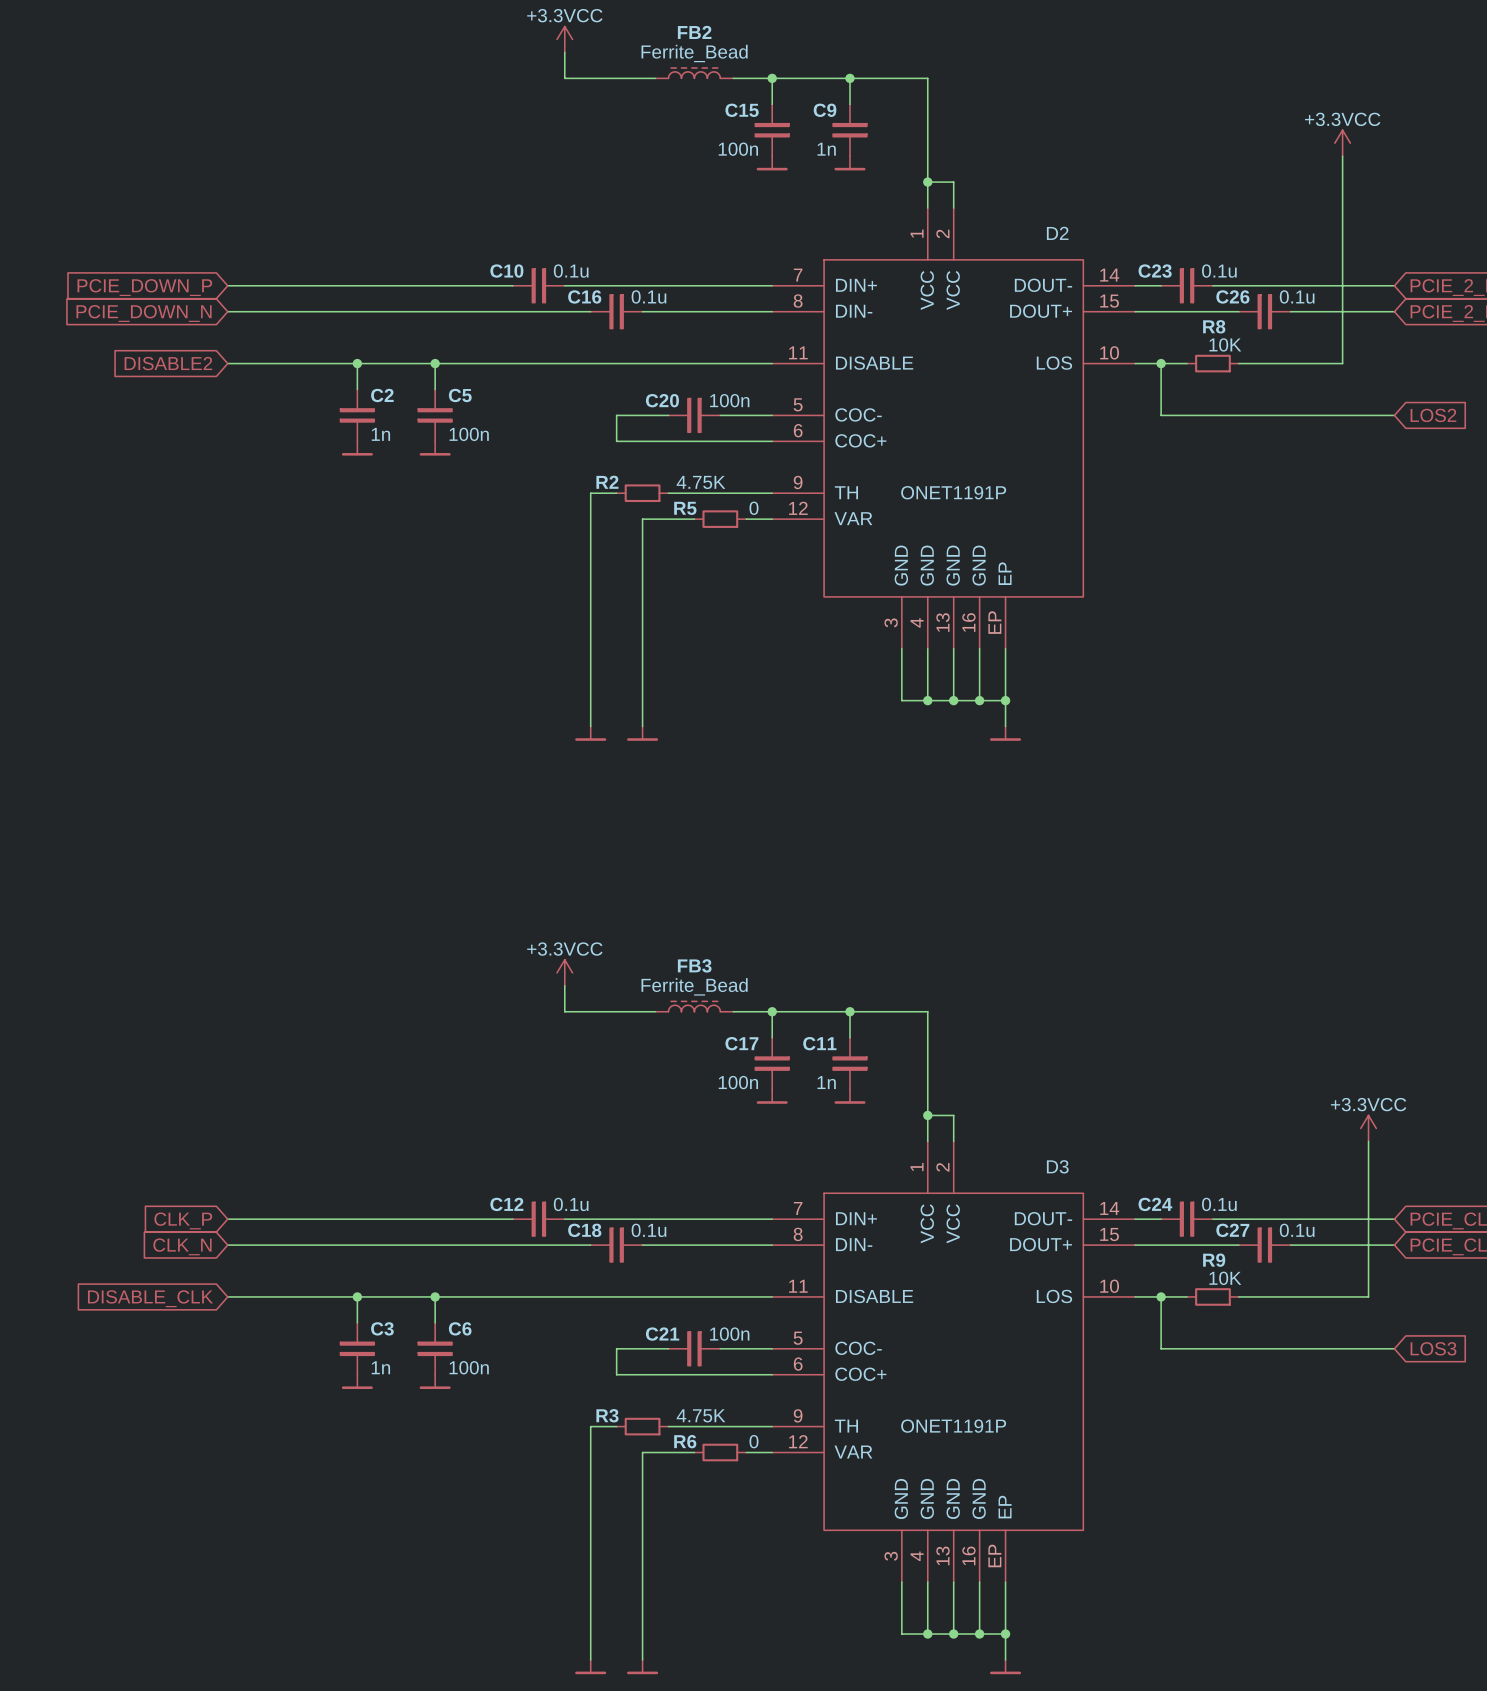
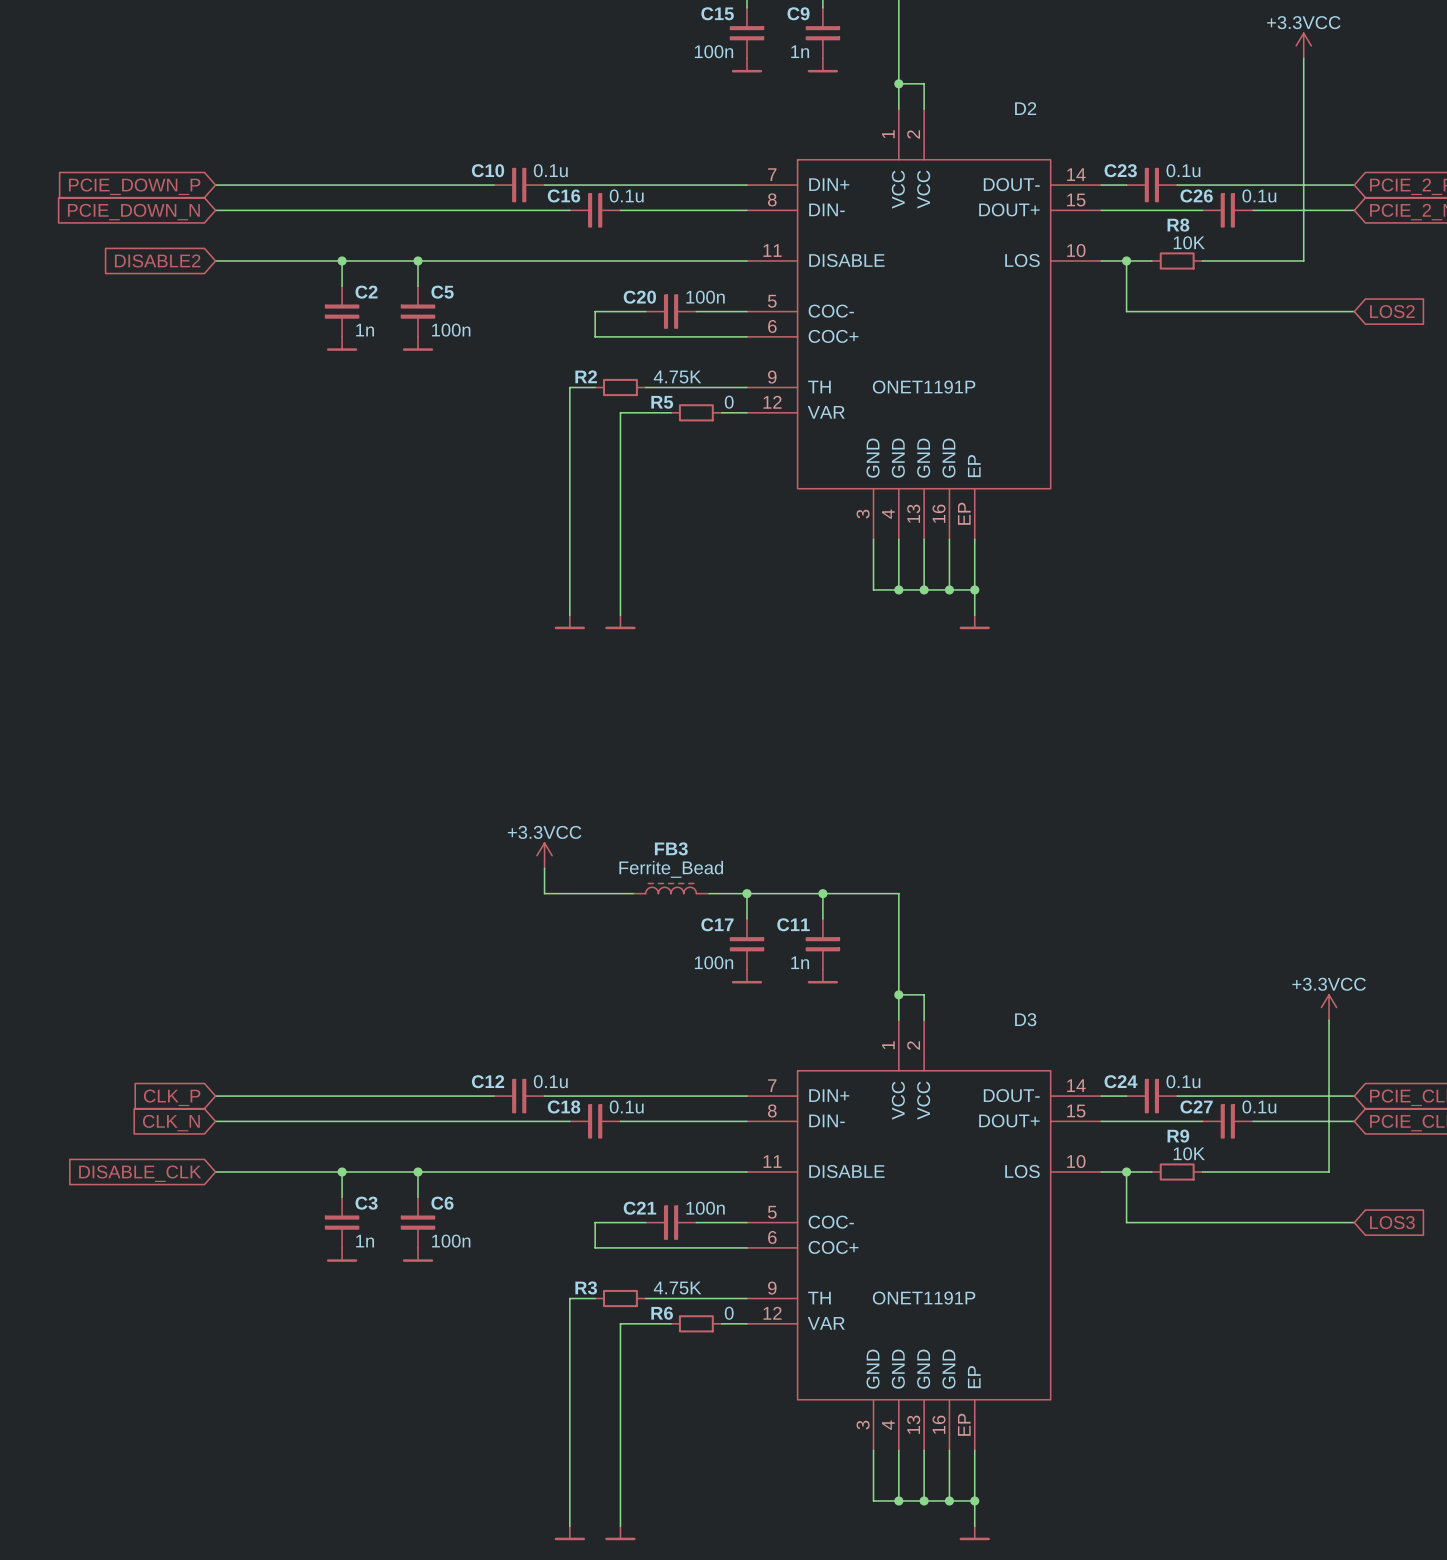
D2 name position: D2 (1057, 233) -> D2 (1025, 108)
D3 name position: D3 (1057, 1166) -> D3 (1025, 1019)

